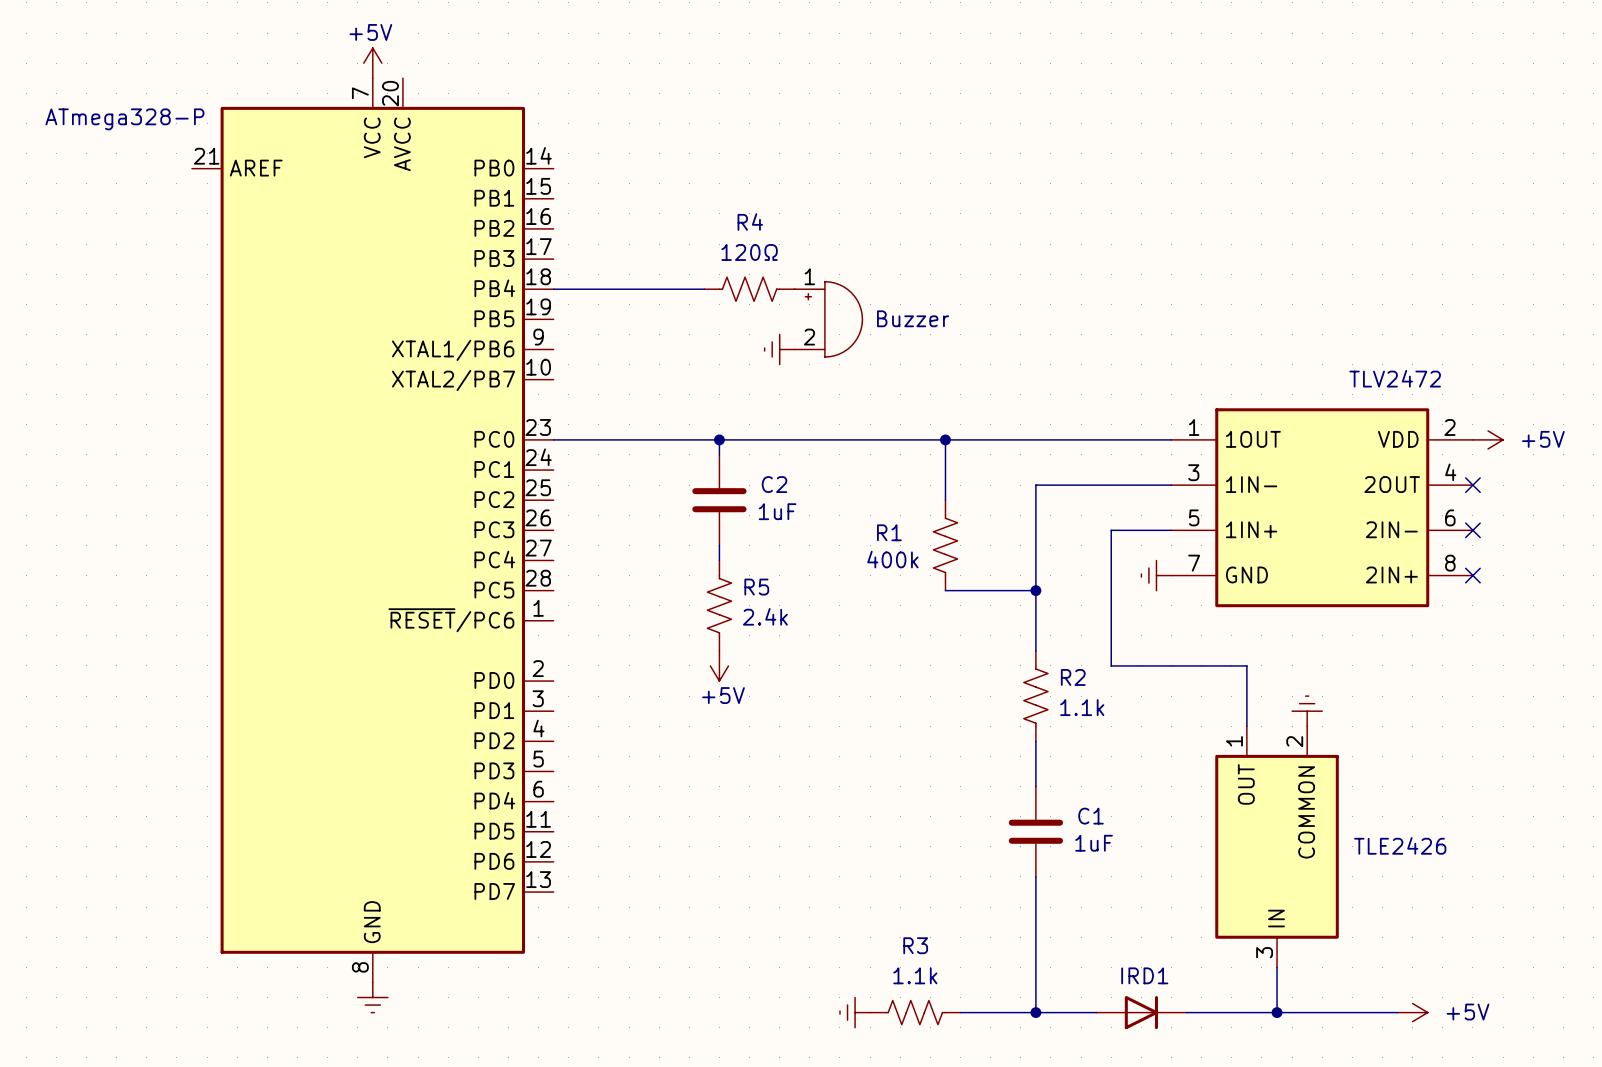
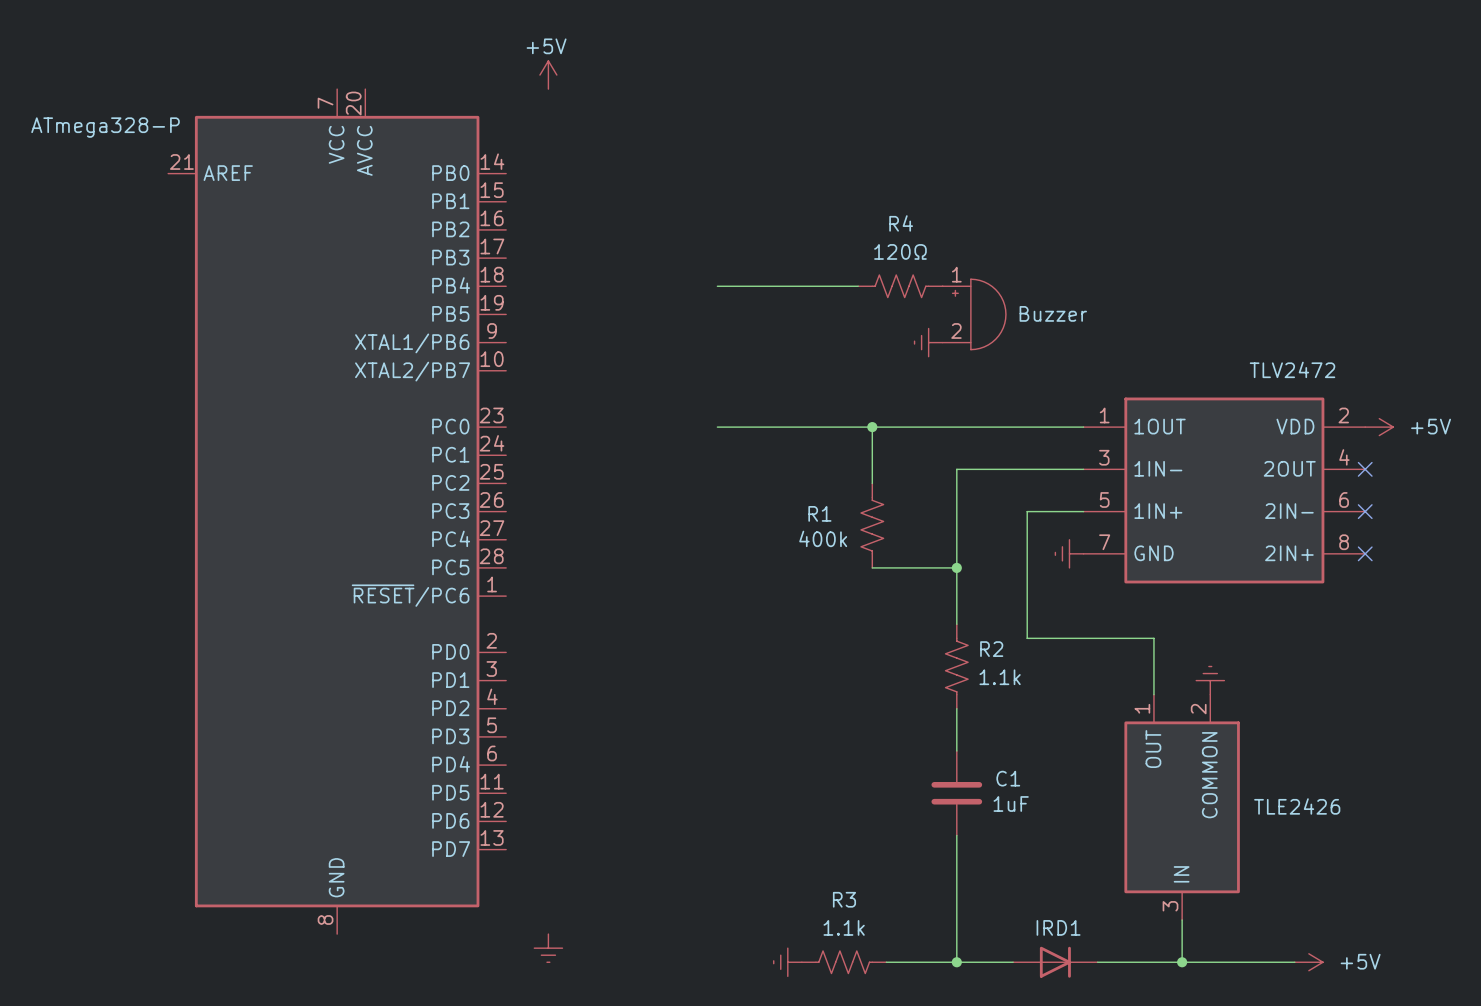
power symbol position: +5V (372, 63) -> +5V (548, 75)
wire: (553, 289) (704, 289) -> (717, 286) (858, 286)
R4 position: (749, 289) -> (900, 286)
part position: (828, 319) -> (974, 314)
power symbol position: (779, 349) -> (928, 342)
wire: (553, 439) (779, 439) -> none
wire: (719, 439) (719, 454) -> none
junction: (719, 439) -> none
C2: 1uF (719, 500) -> none
wire: (719, 545) (719, 560) -> none
R5: 2.4k (719, 605) -> none
power symbol: +5V (719, 665) -> none
power symbol position: (372, 997) -> (548, 948)

